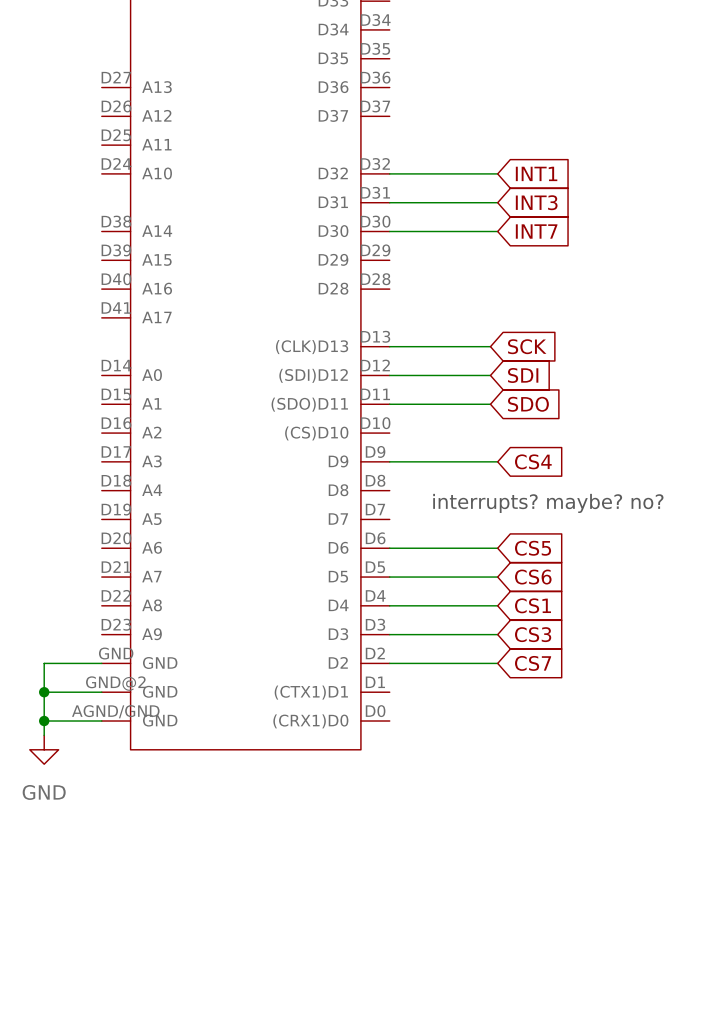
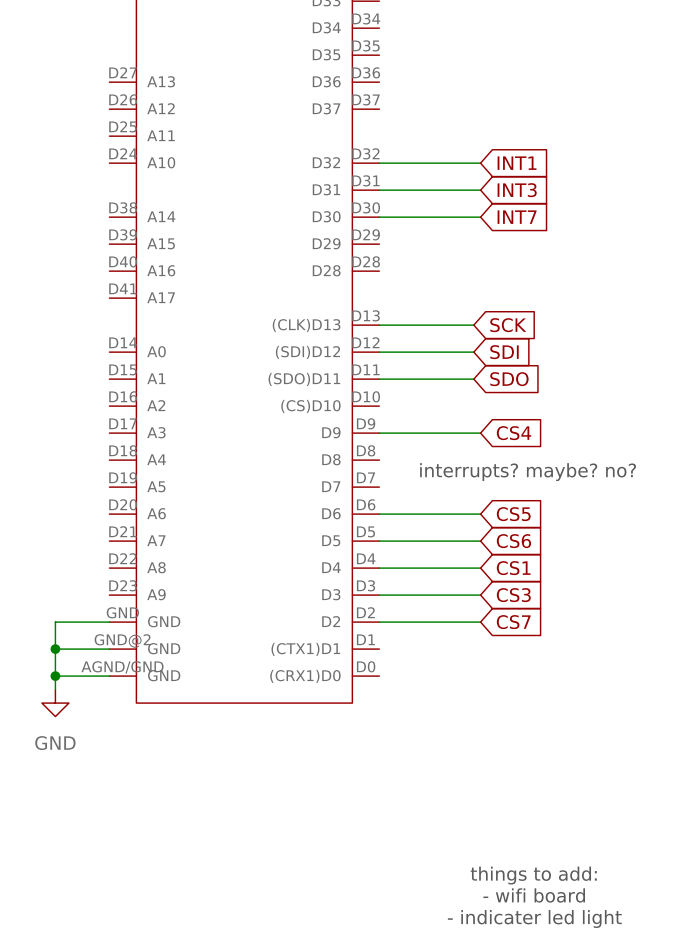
text: none -> things to add: (533, 875)
text: none -> - wifi board (534, 895)
text: none -> - indicater led light (534, 919)

